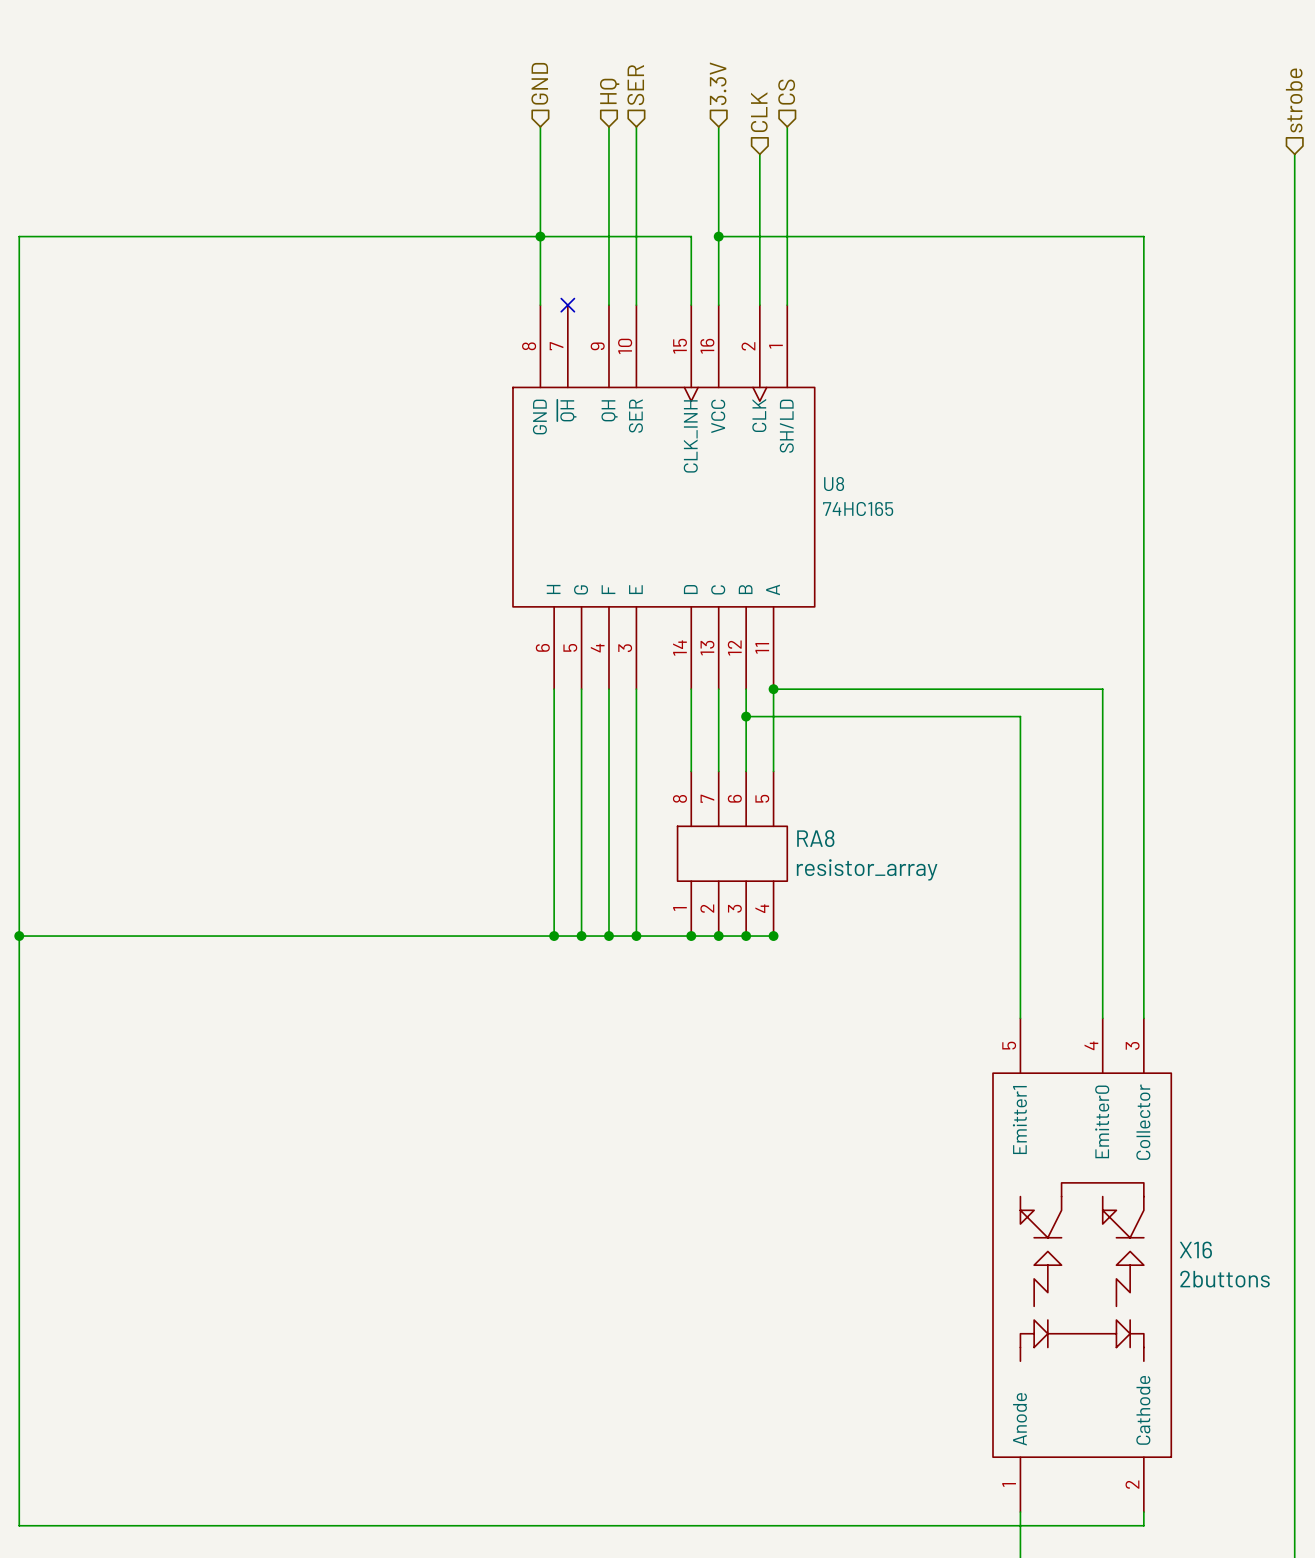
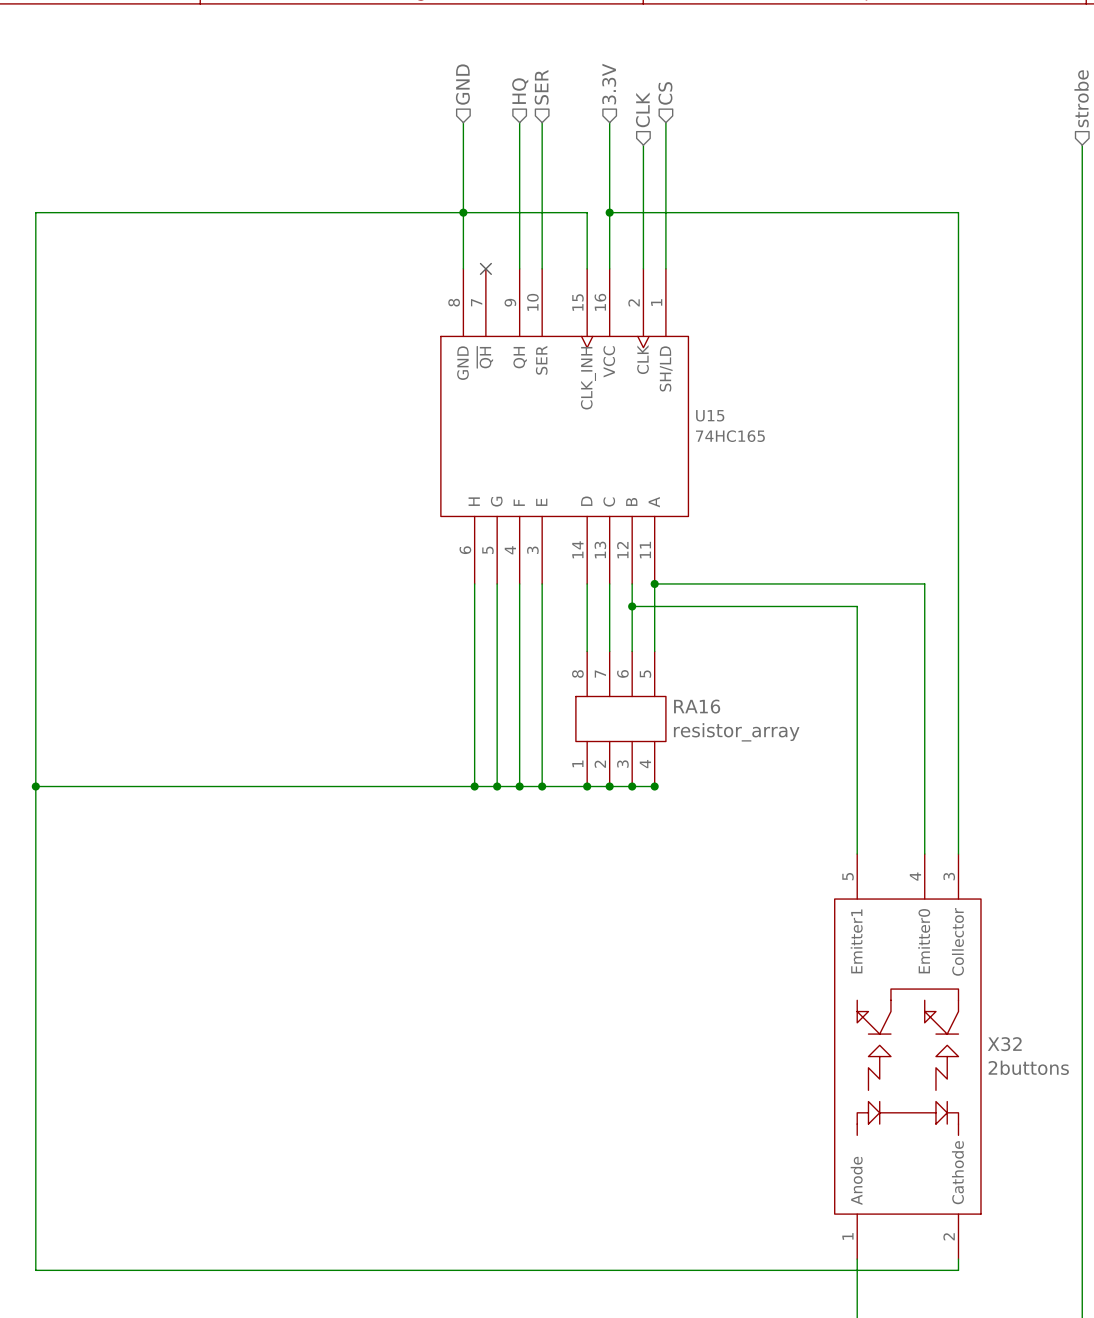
U8 name: U8 (834, 484) -> U15 (710, 415)
RA8 name: RA8 (815, 838) -> RA16 (697, 706)
X16 name: X16 (1195, 1250) -> X32 (1004, 1044)

